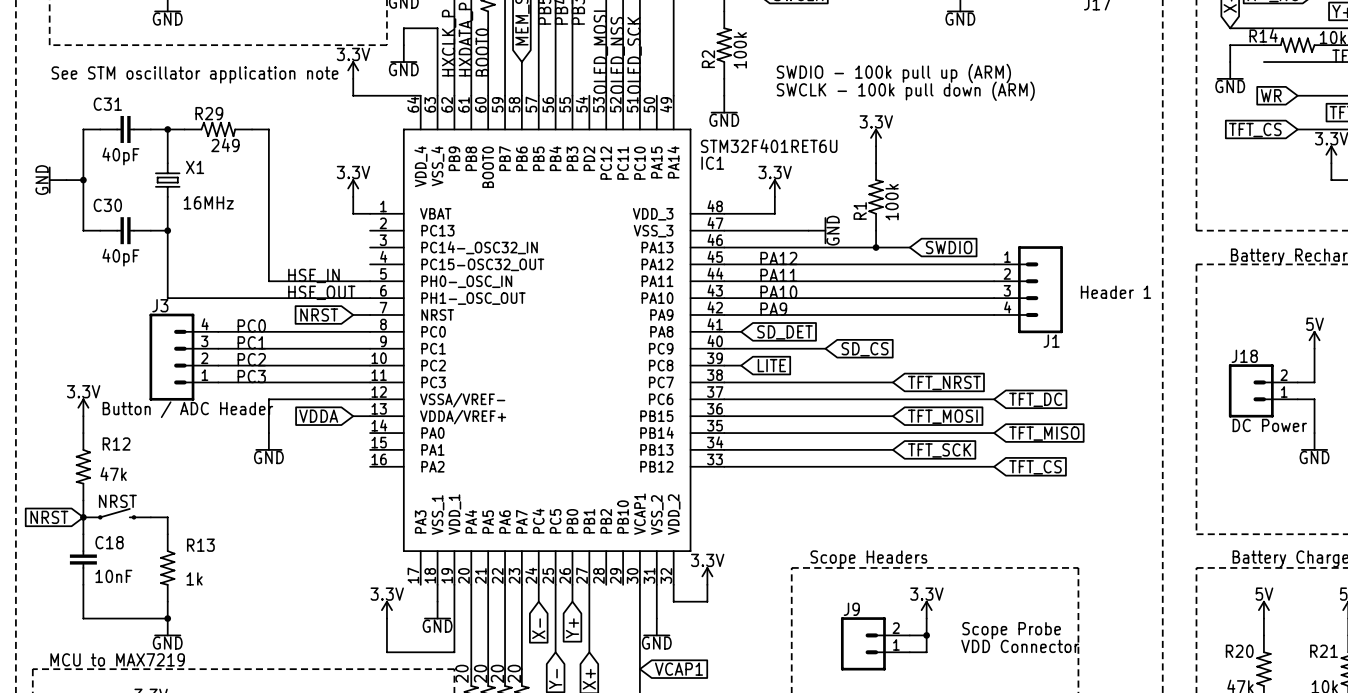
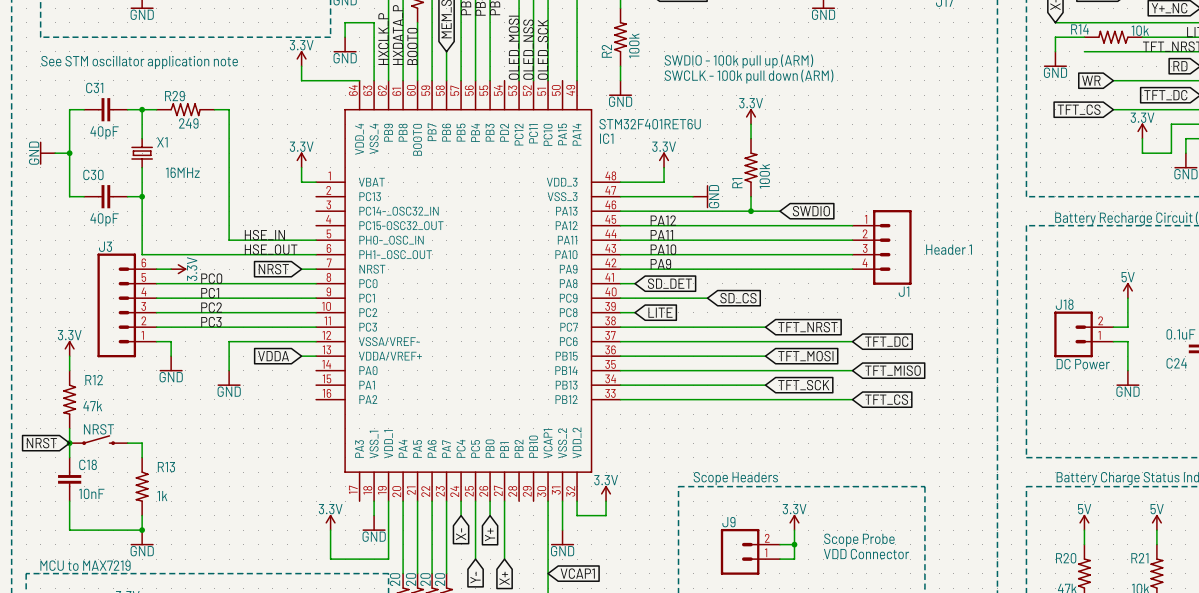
J3 name position: J3 (160, 305) -> J3 (105, 246)
J3 symbol: [149, 313, 219, 401] -> [97, 253, 157, 358]
power symbol: none -> 3.3V (178, 269)
wire: none -> (156, 341) (171, 341) (171, 356)
J3 value: Button / ADC Header (187, 409) -> none
power symbol: none -> GND (171, 363)

